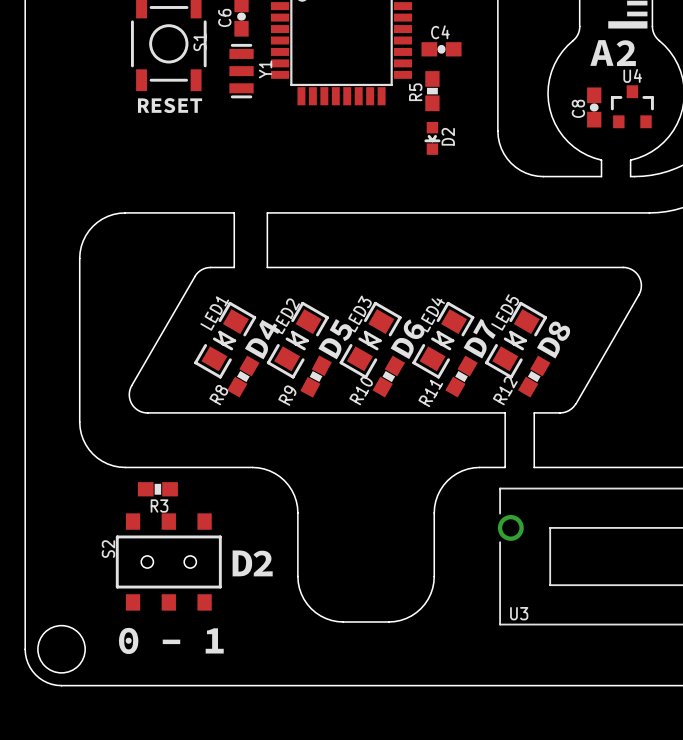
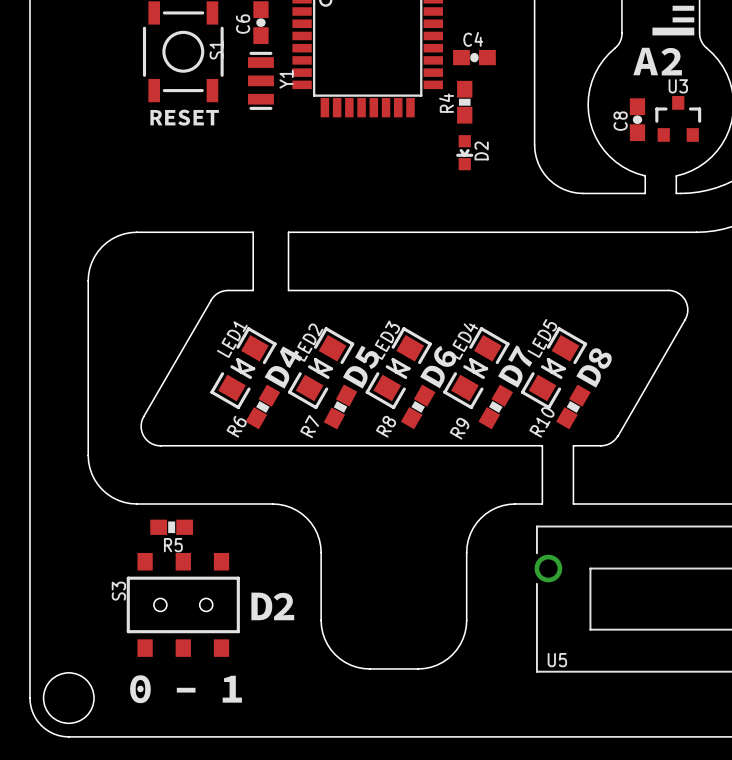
U4 name: U4 (632, 75) -> U3 (678, 86)
R5 name: R5 (415, 92) -> R4 (446, 103)
R10 name: R10 (361, 390) -> R8 (386, 426)
R12 name: R12 (505, 390) -> R10 (541, 422)
R11 name: R11 (430, 393) -> R9 (459, 428)
R8 name: R8 (218, 395) -> R6 (236, 426)
R9 name: R9 (287, 395) -> R7 (309, 426)
R3 name: R3 (159, 506) -> R5 (173, 545)
S2 name: S2 (108, 549) -> S3 (118, 591)
U3 name: U3 (519, 613) -> U5 (557, 660)

